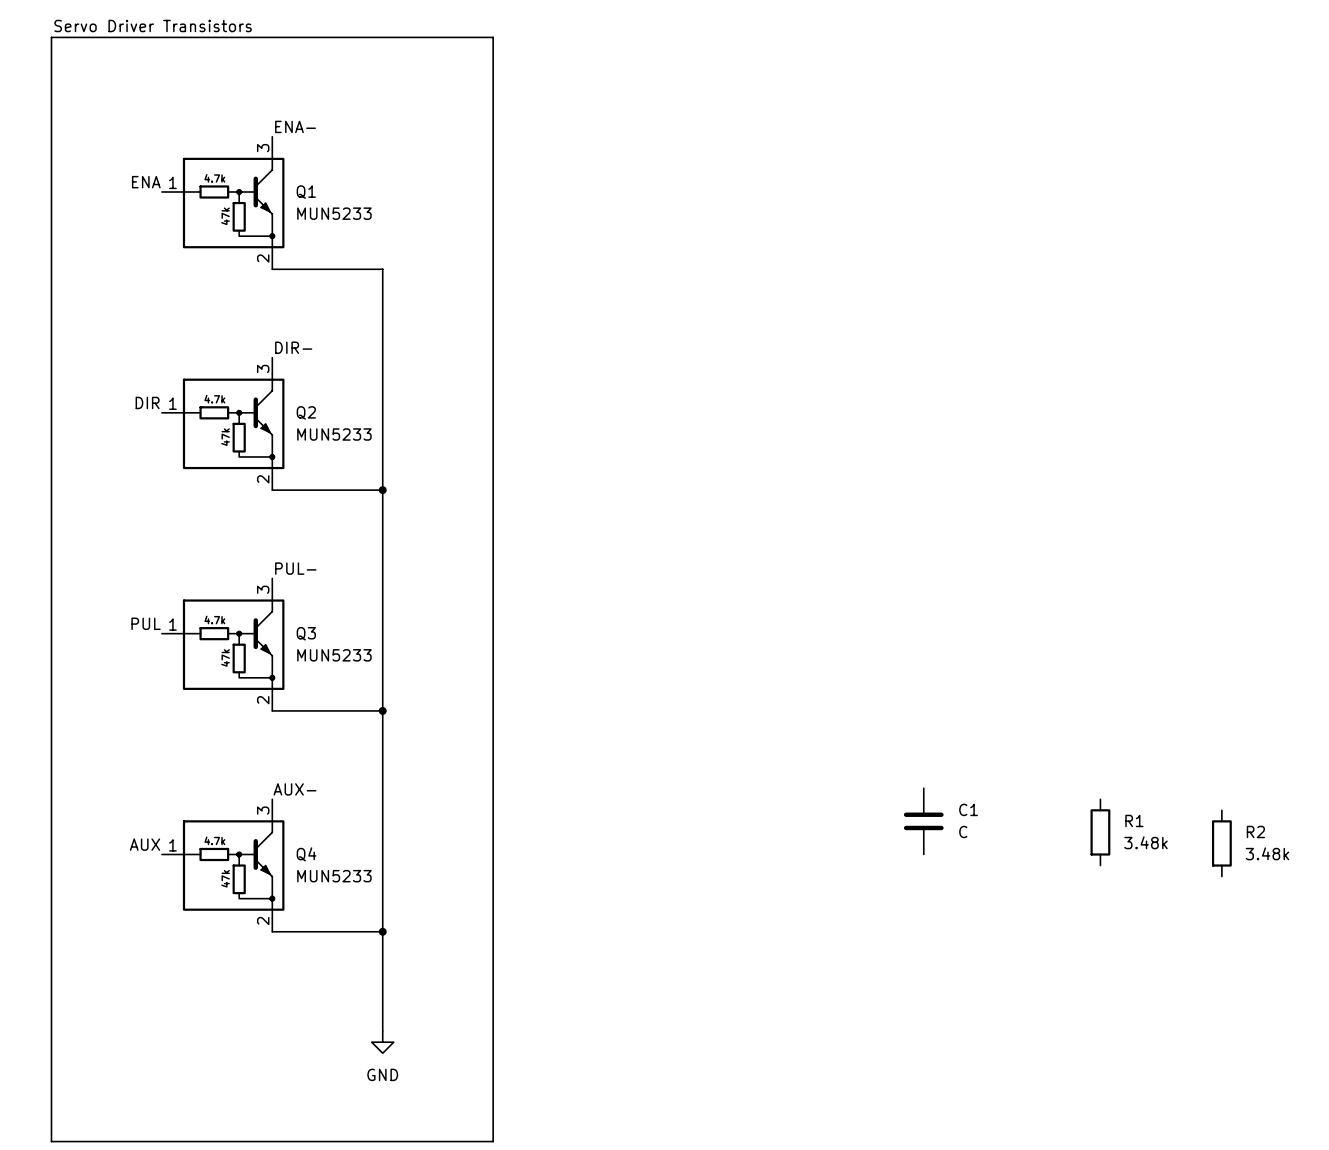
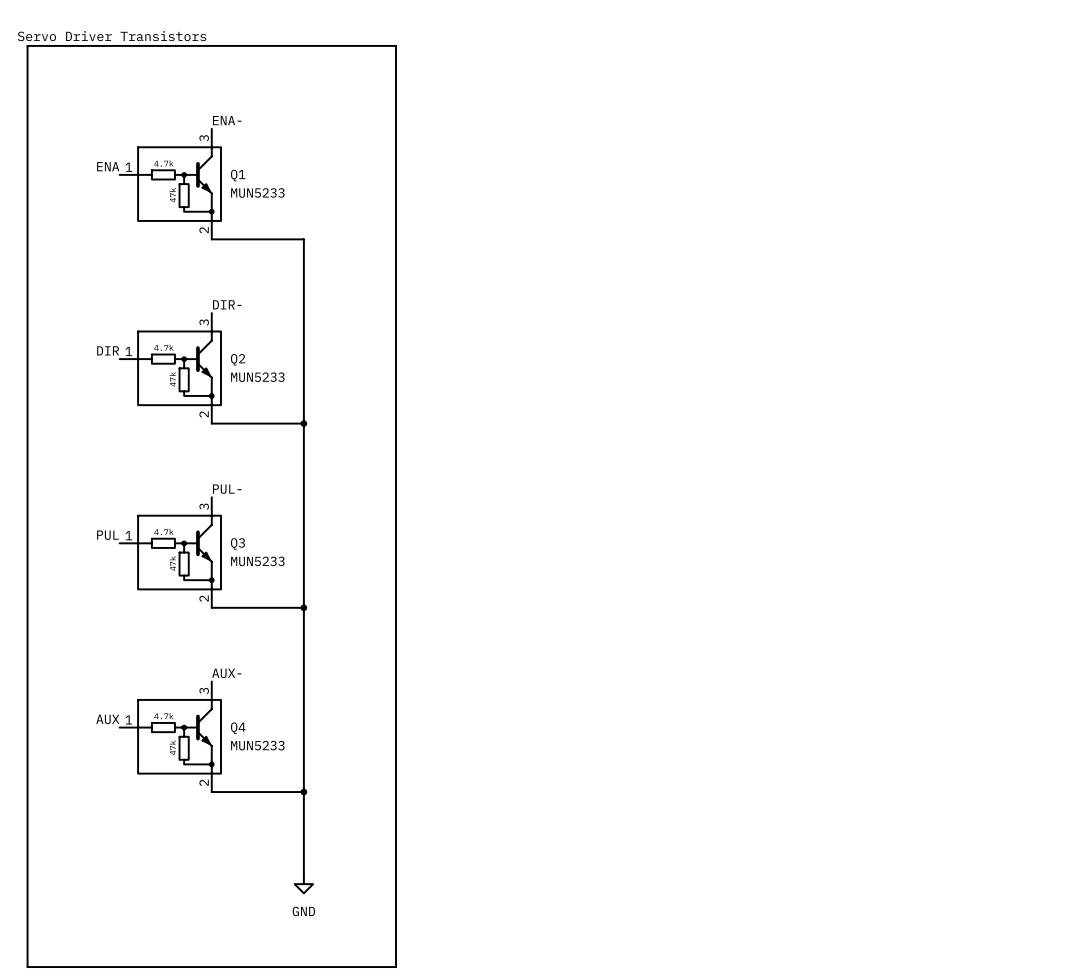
C1: C (923, 821) -> none
R1: 3.48k (1100, 832) -> none
R2: 3.48k (1221, 843) -> none

